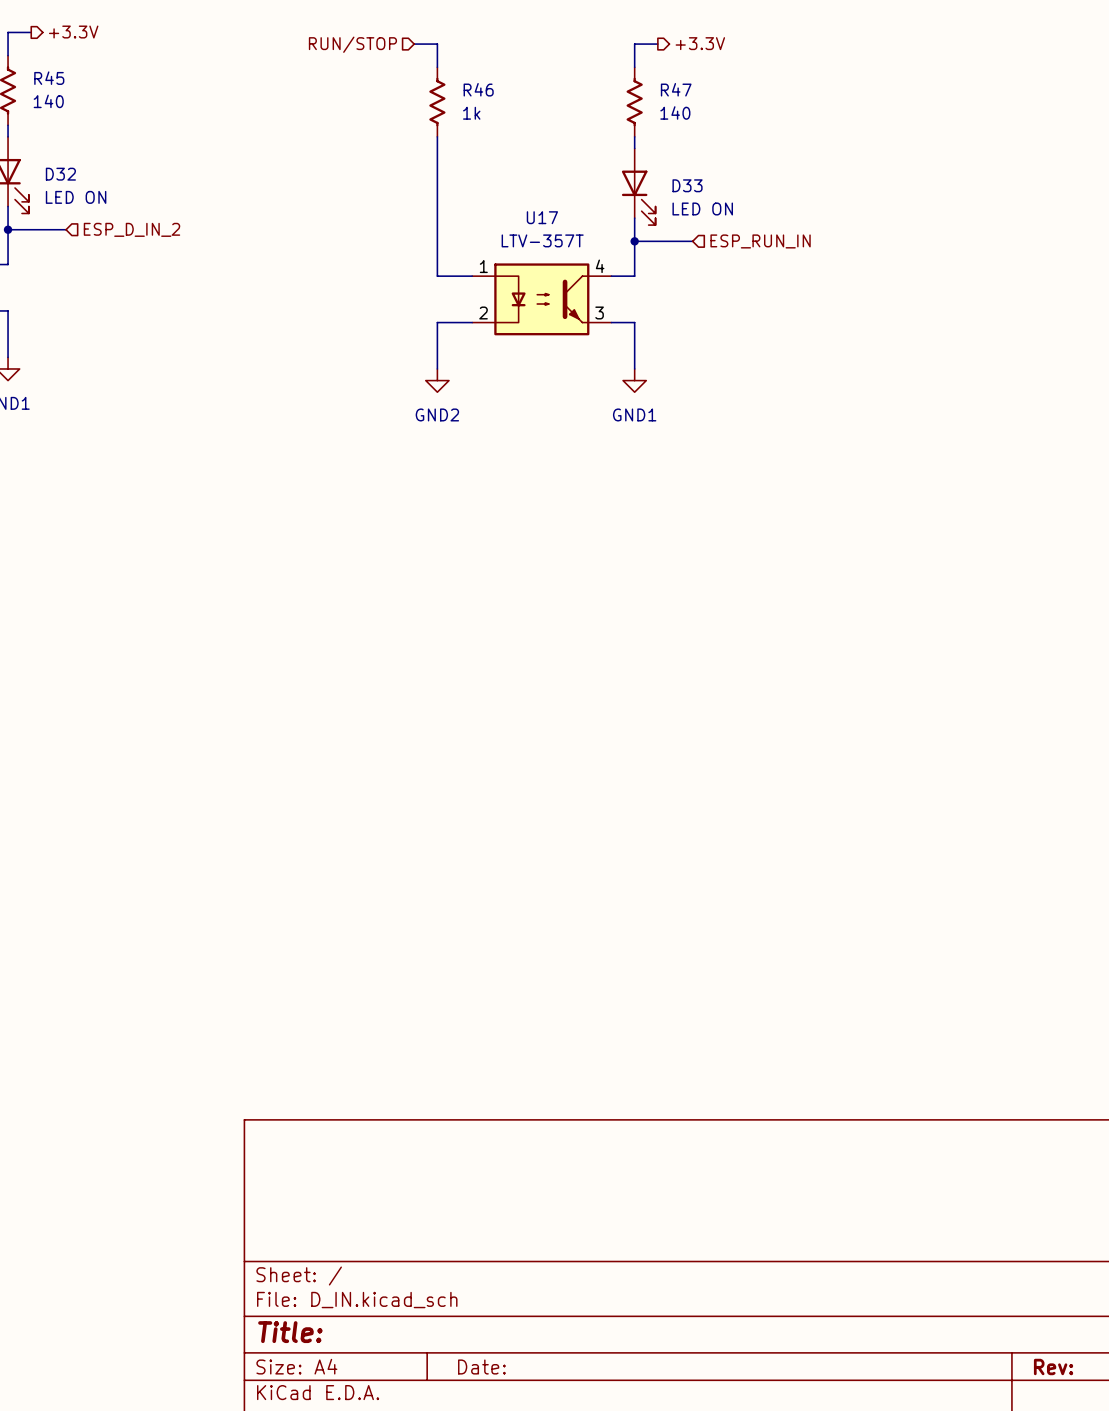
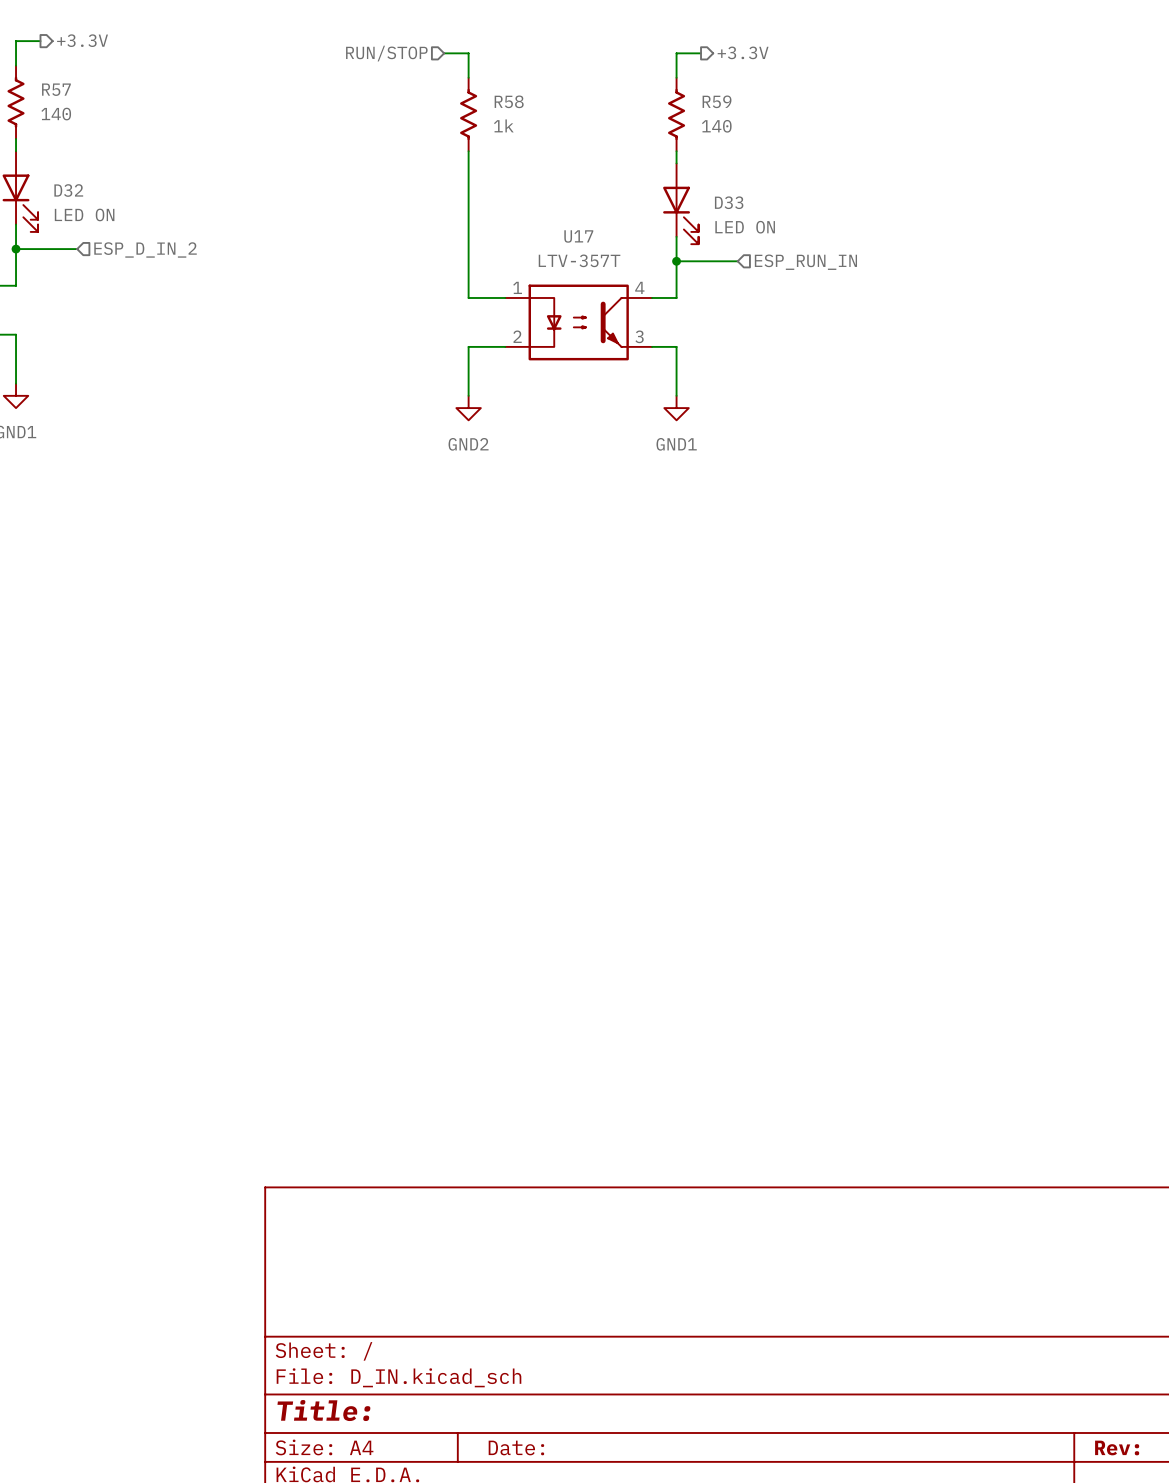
R45 name: R45 (49, 78) -> R57 (56, 89)
R46 name: R46 (478, 89) -> R58 (509, 101)
R47 name: R47 (676, 89) -> R59 (717, 101)

